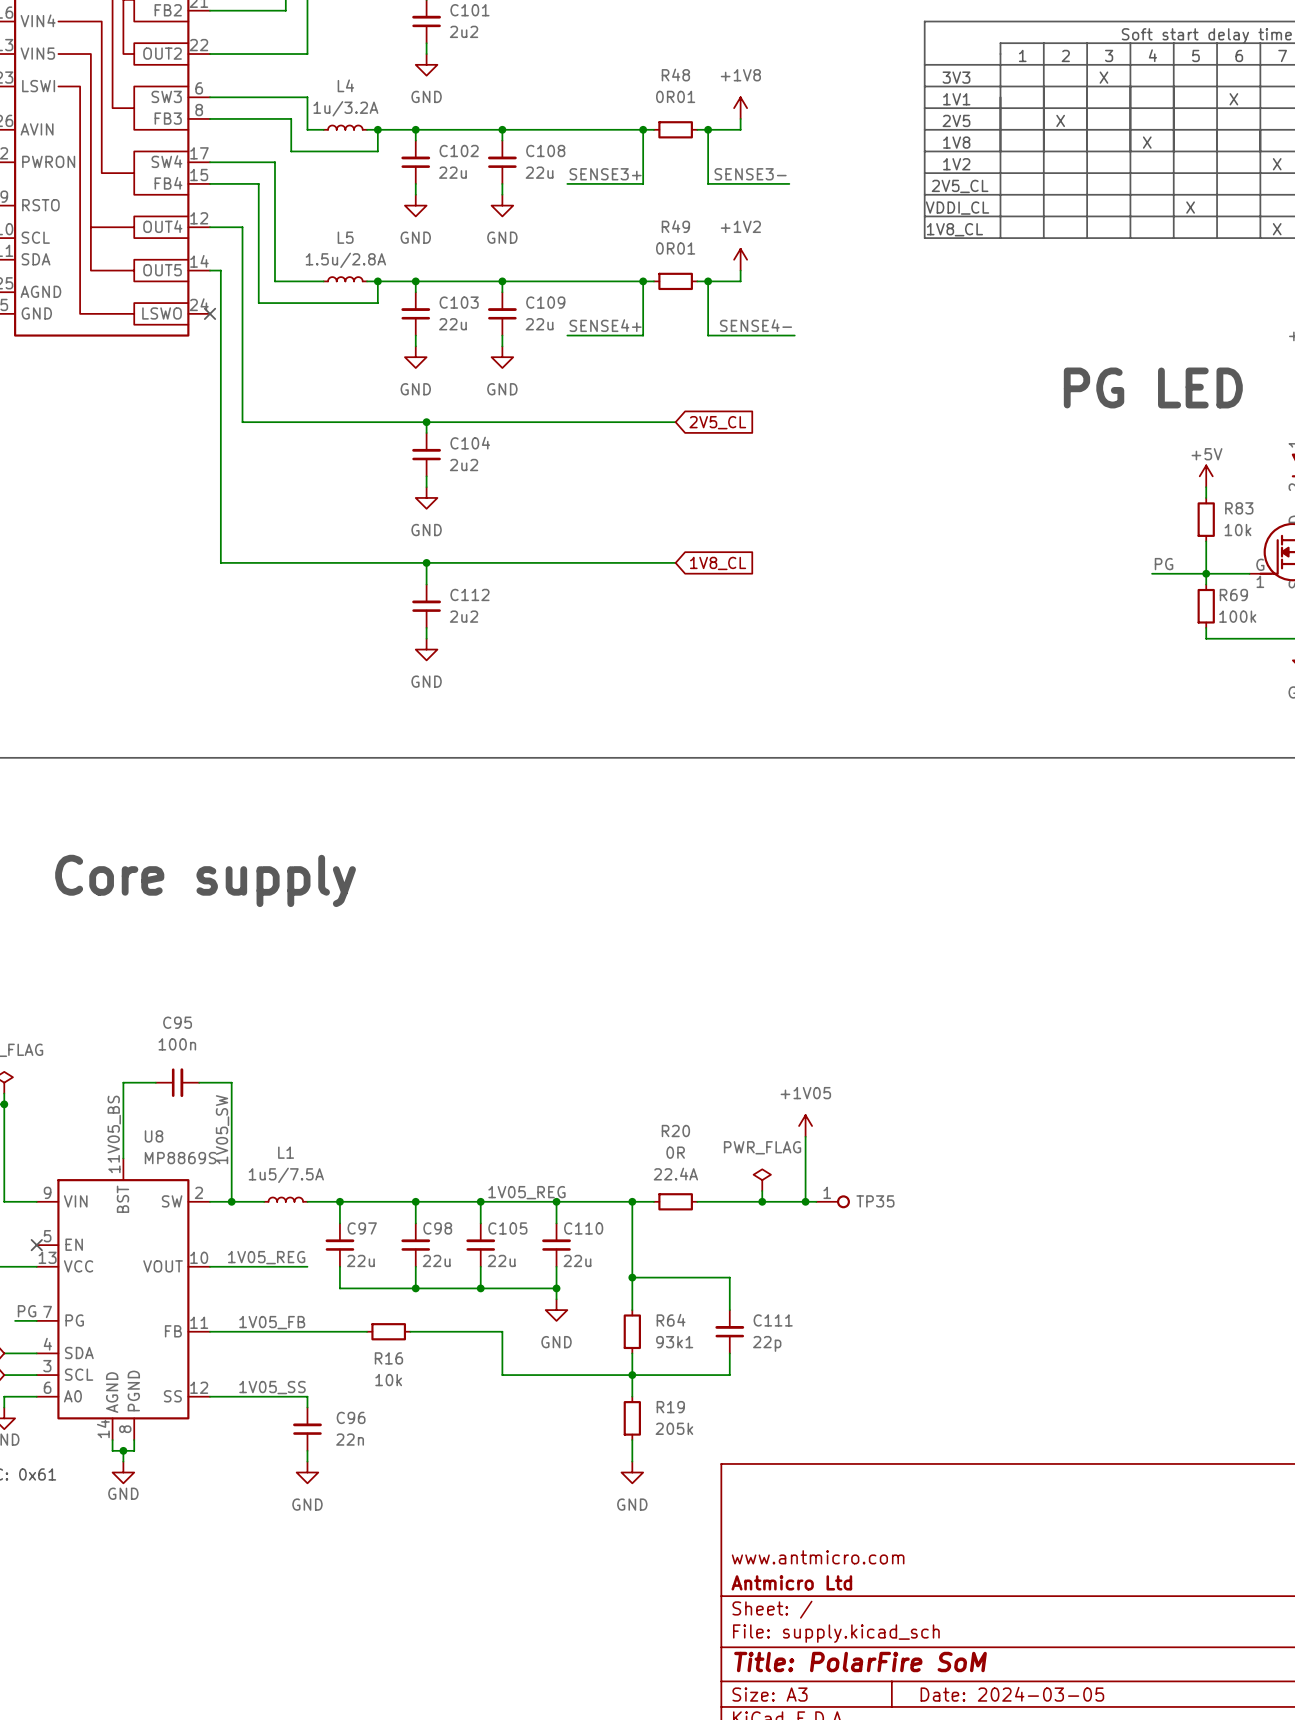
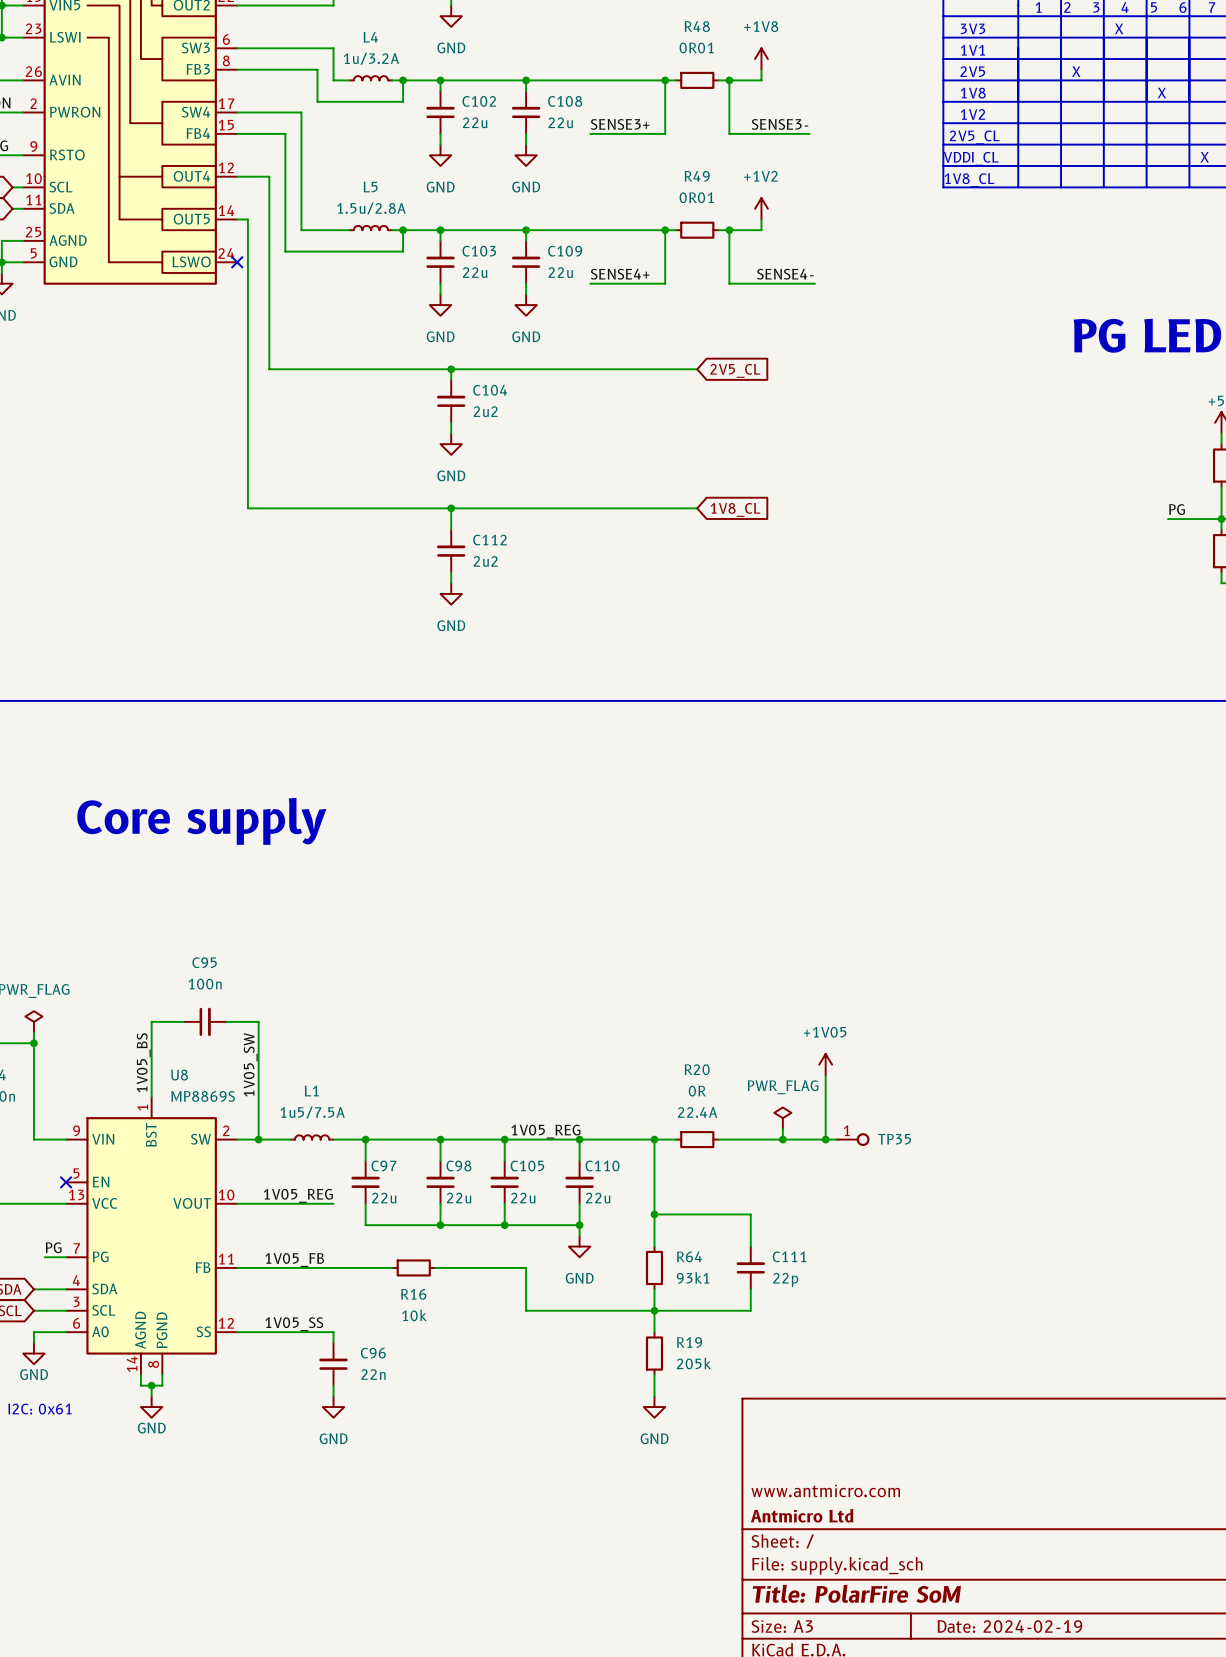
title block: Date: 2024-03-05 (1012, 1694) -> Date: 2024-02-19 (1009, 1626)

